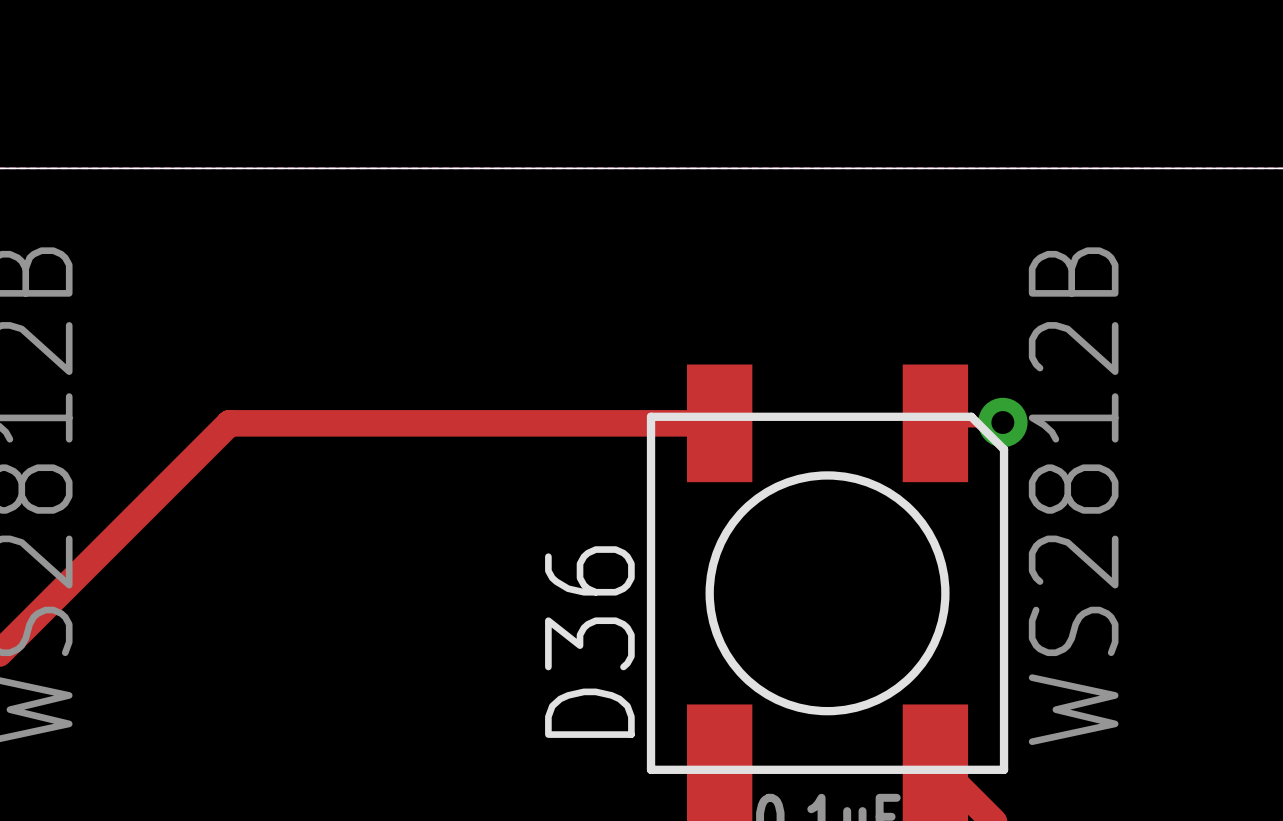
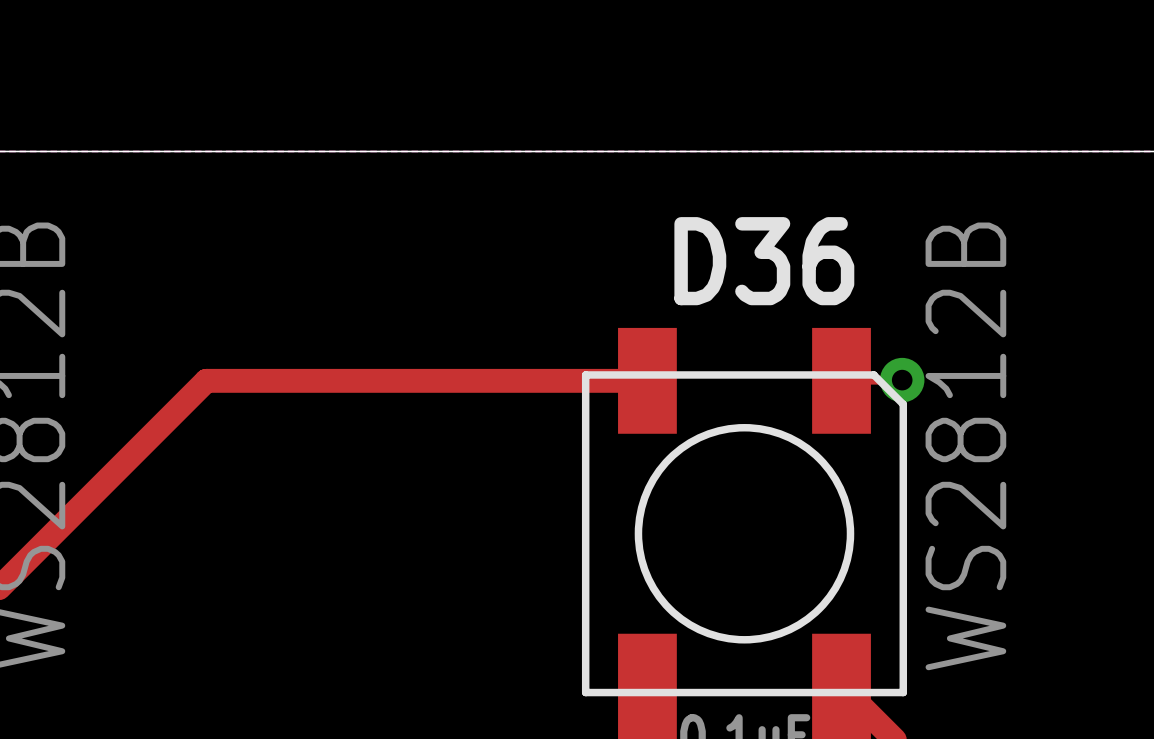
D36 name rotation: 0° (589, 642) -> 90° clockwise (764, 261)
D36 name position: D36 (589, 642) -> D36 (764, 261)

